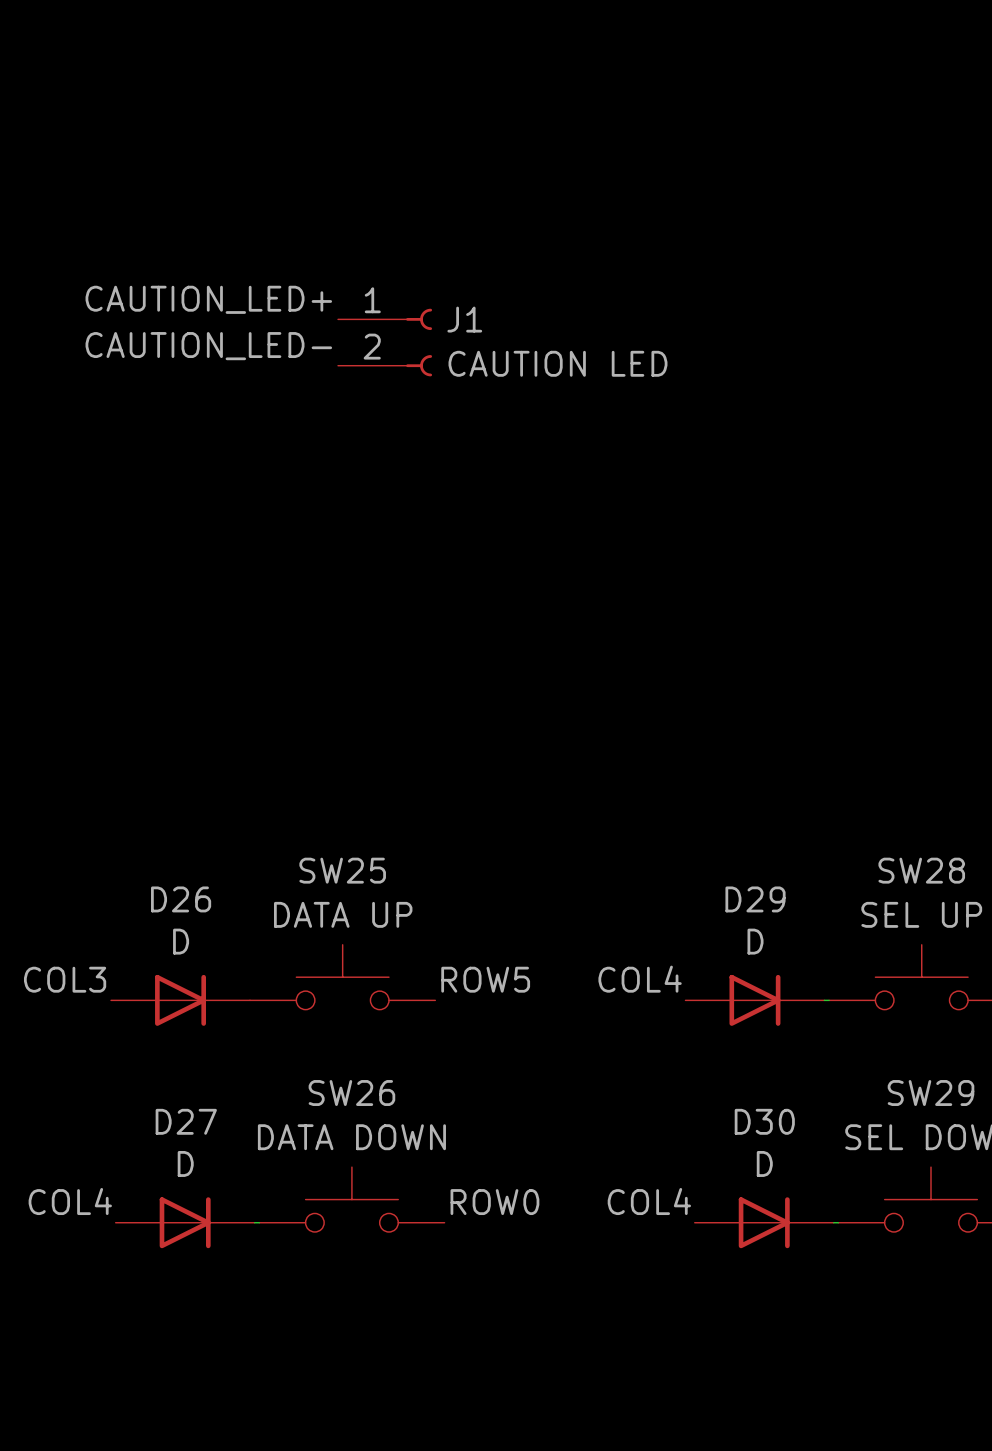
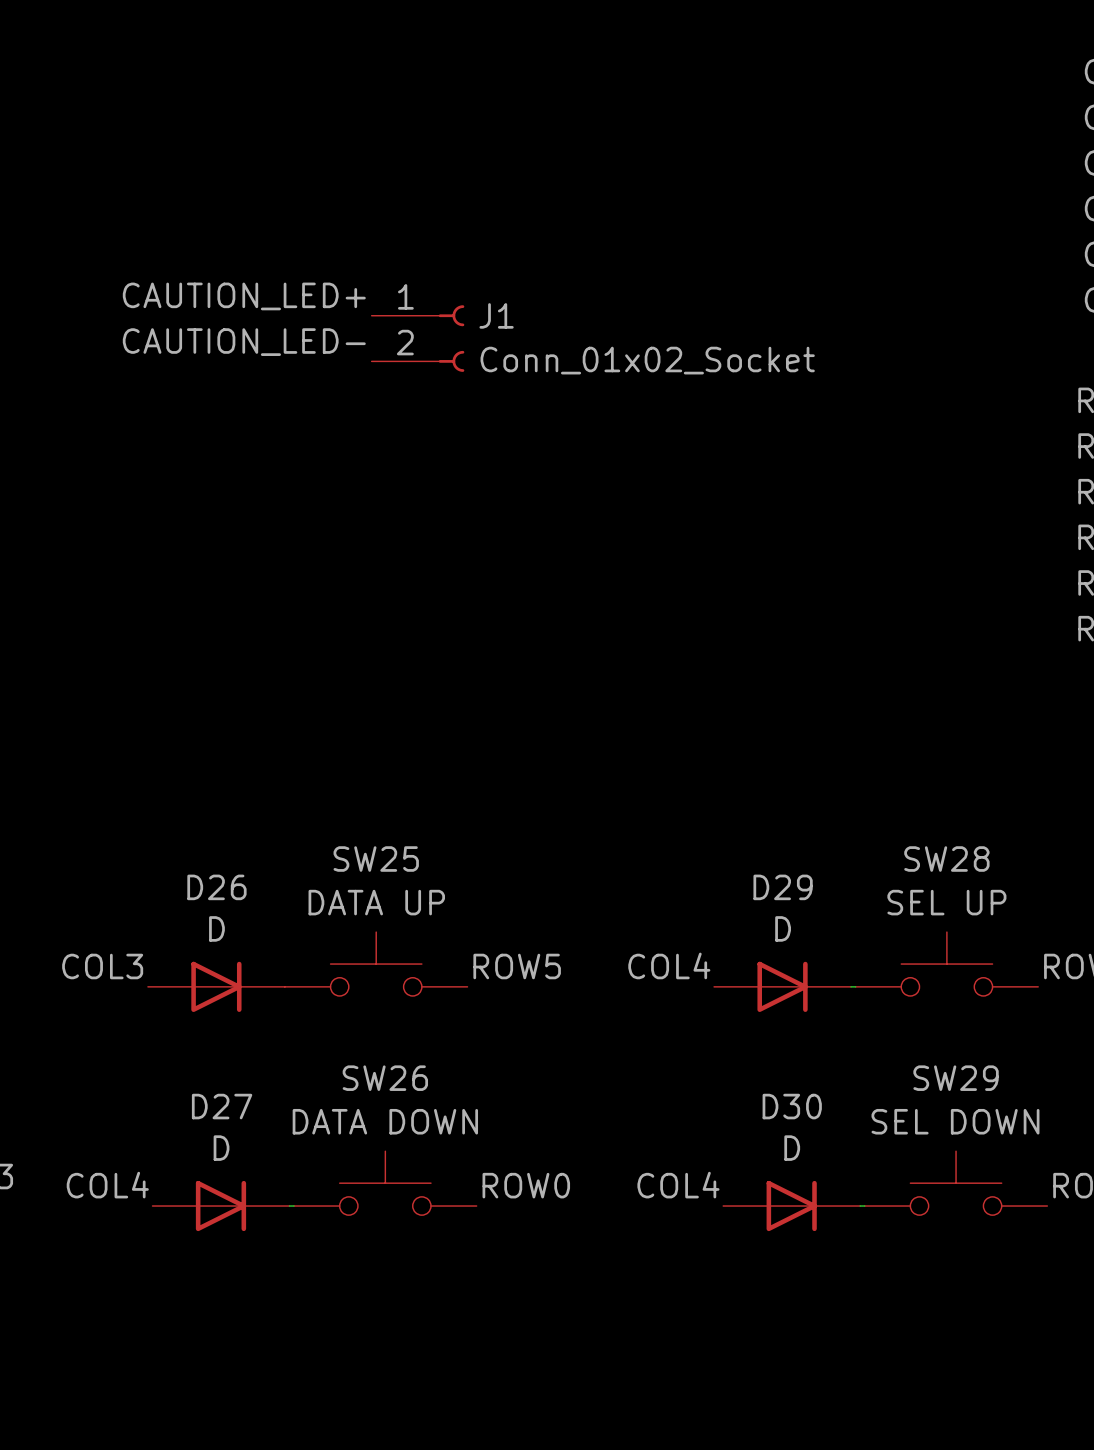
J1 value: CAUTION LED (557, 363) -> Conn_01x02_Socket (647, 360)

